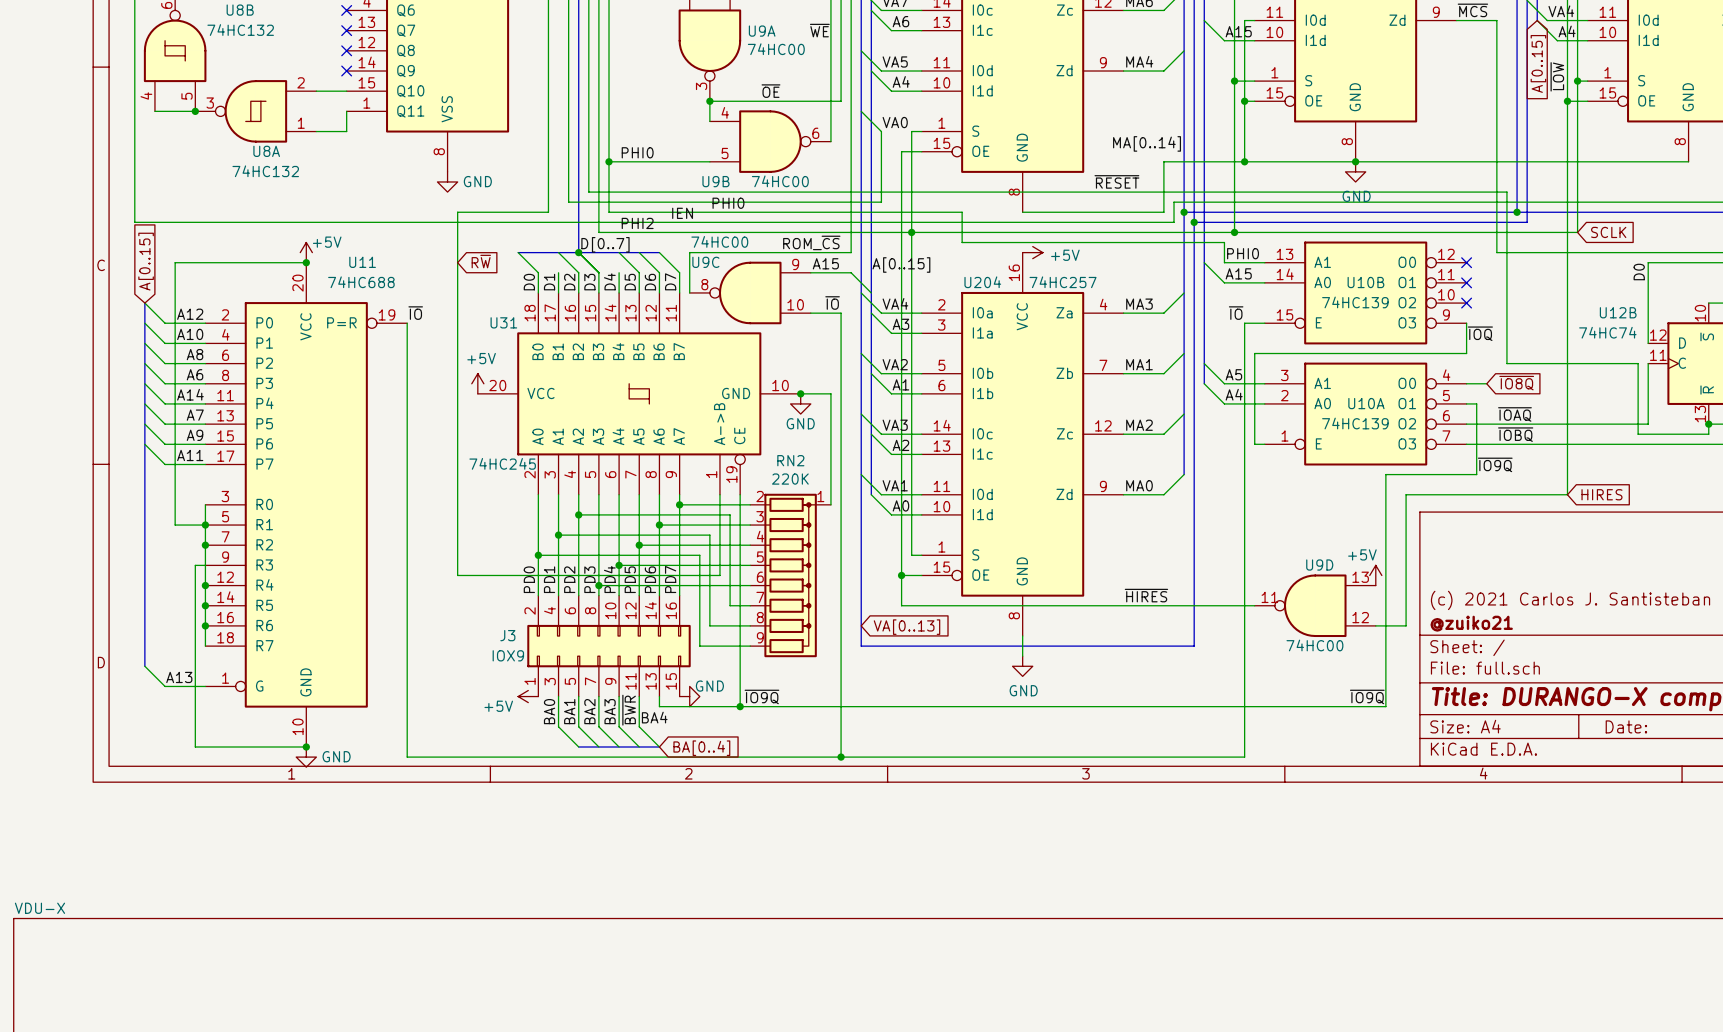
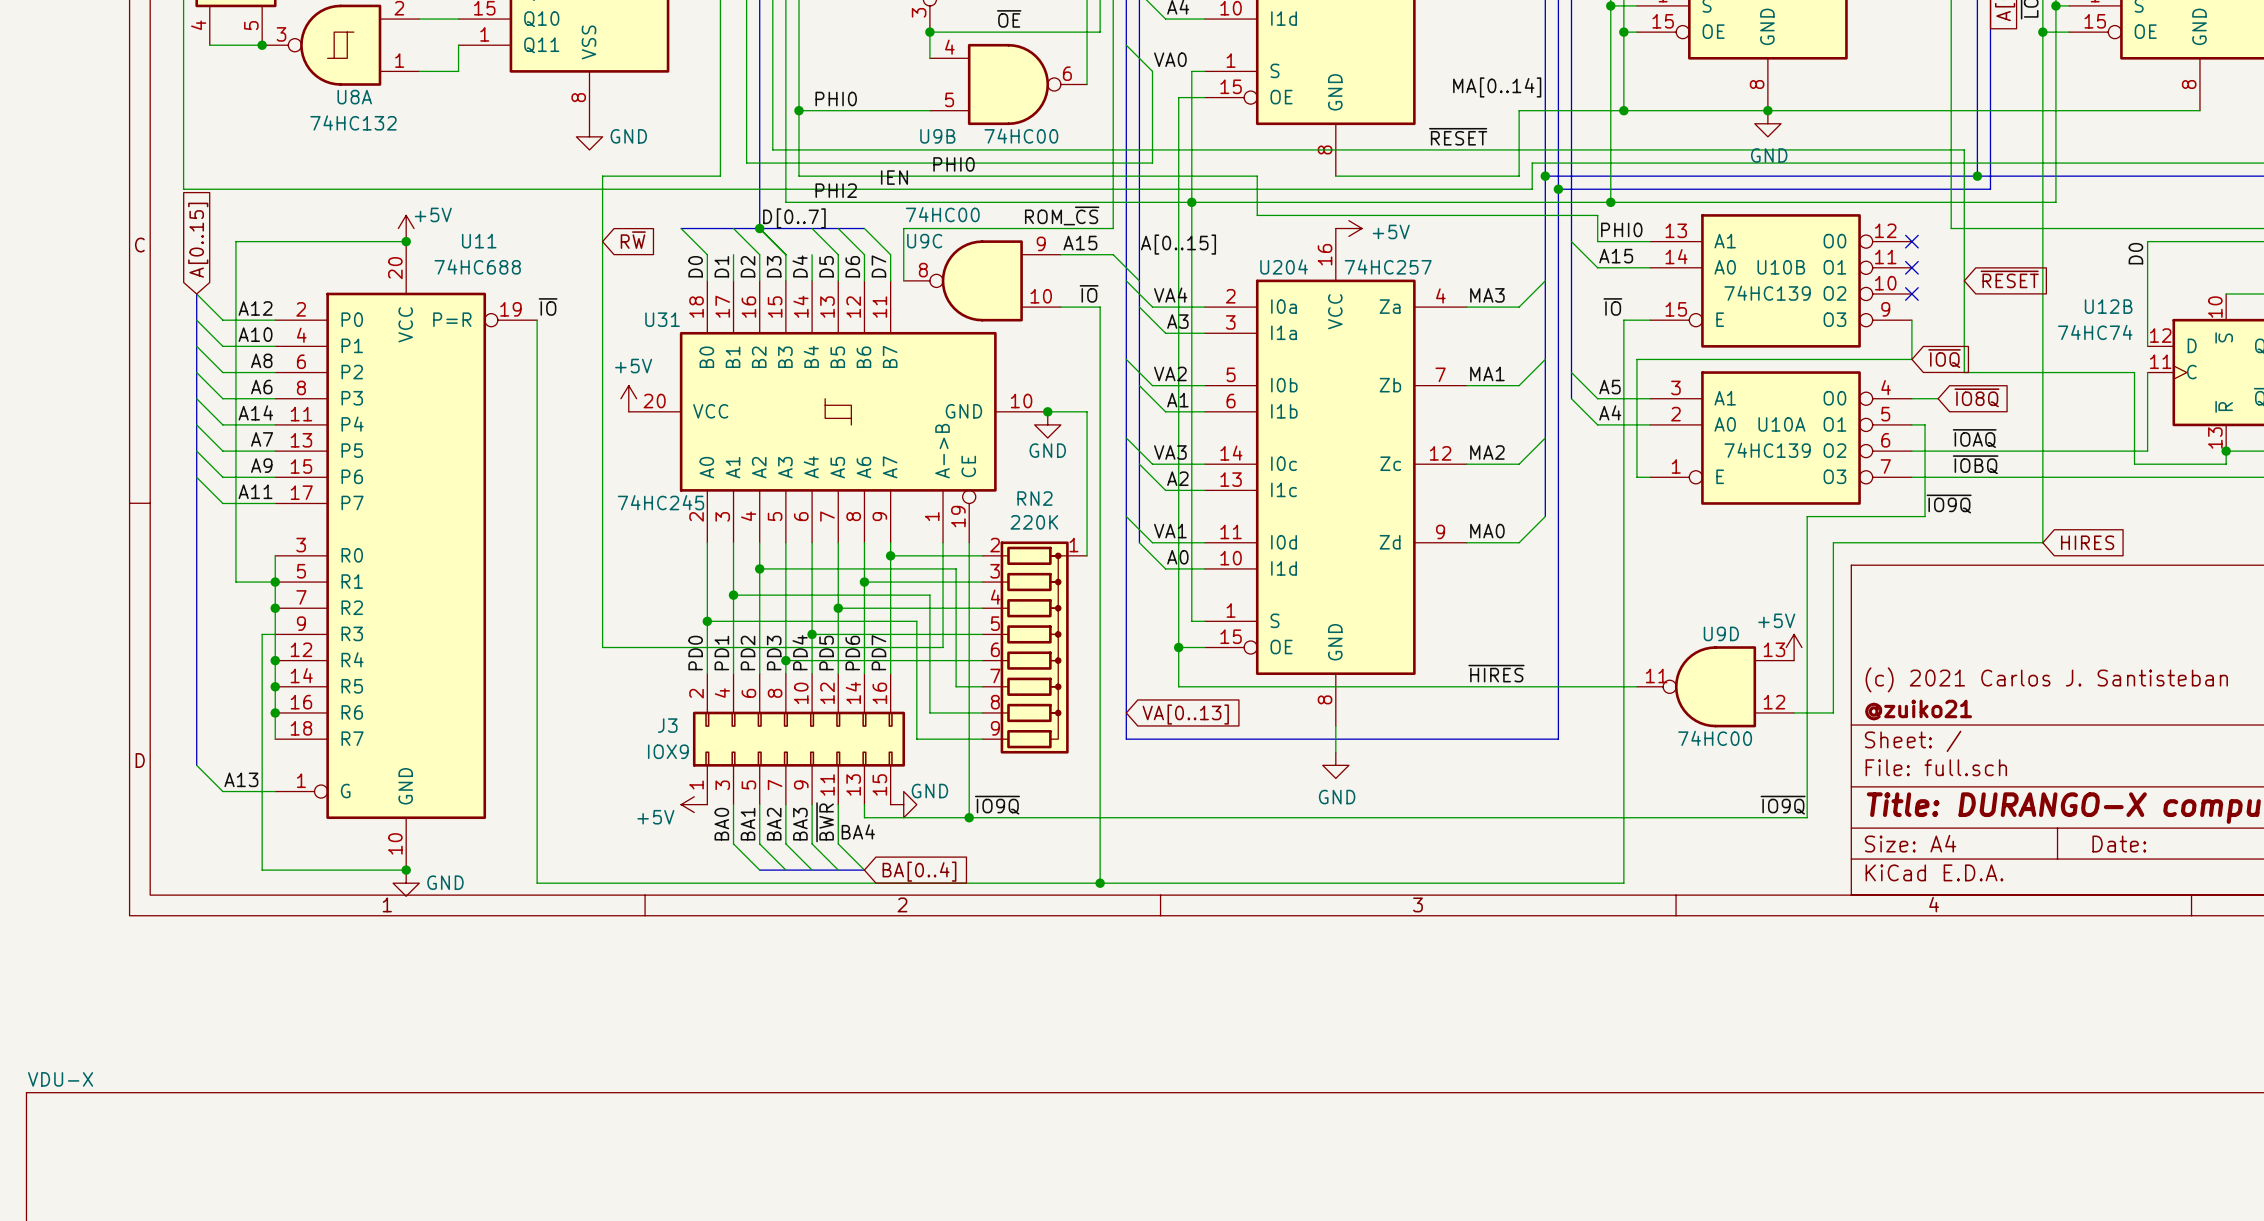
global label: SCLK (1608, 232) -> none
global label: none -> ~{RESET} (2009, 279)
label: ~{IOQ} (1480, 333) -> none
global label: none -> ~{IOQ} (1944, 358)

